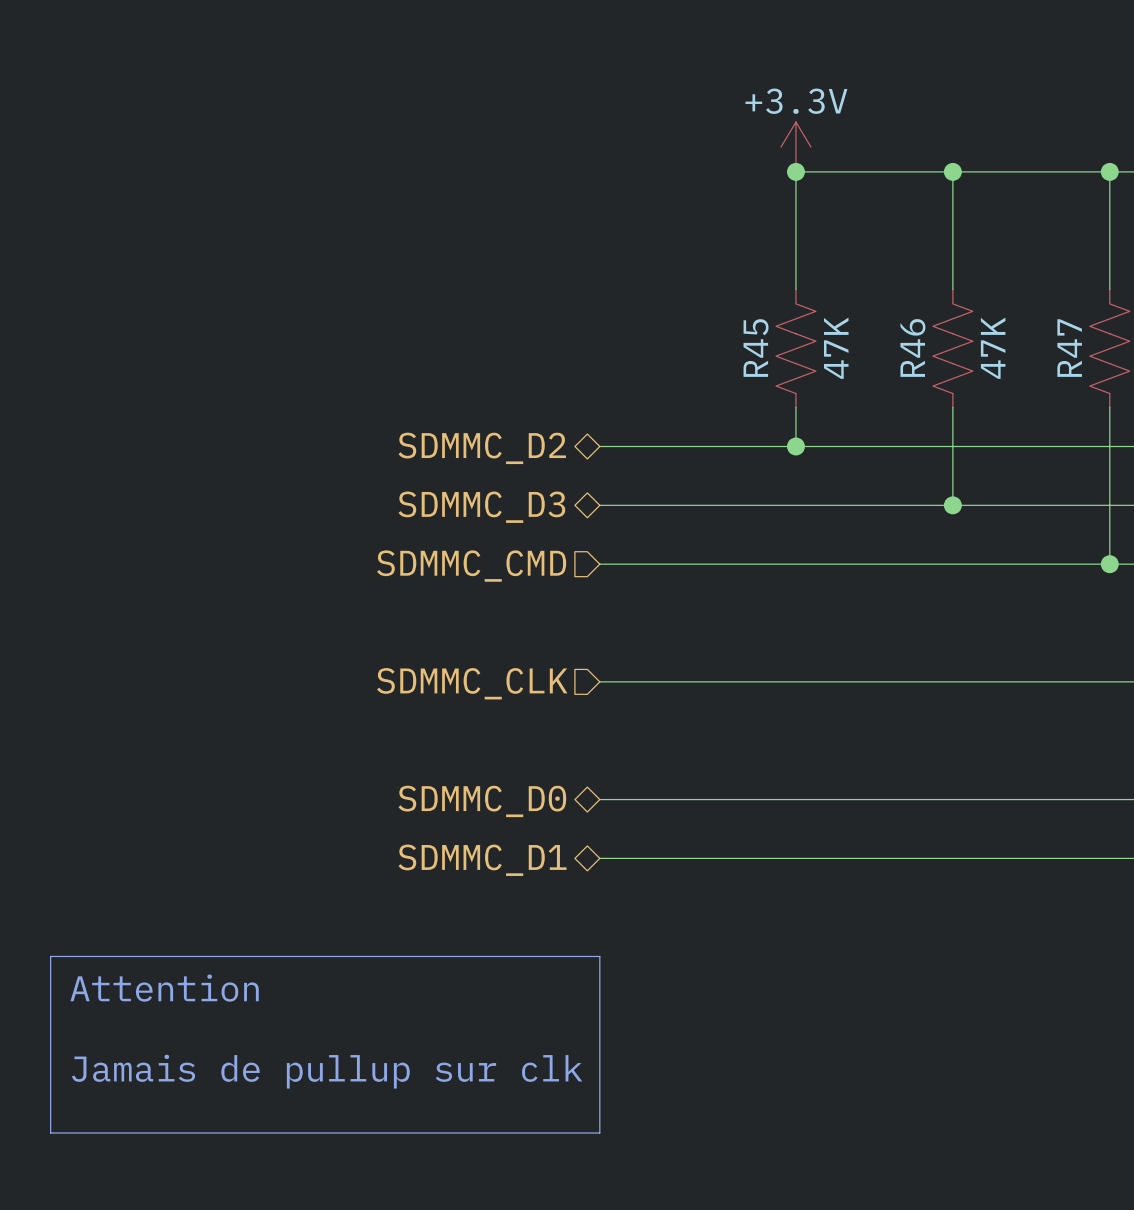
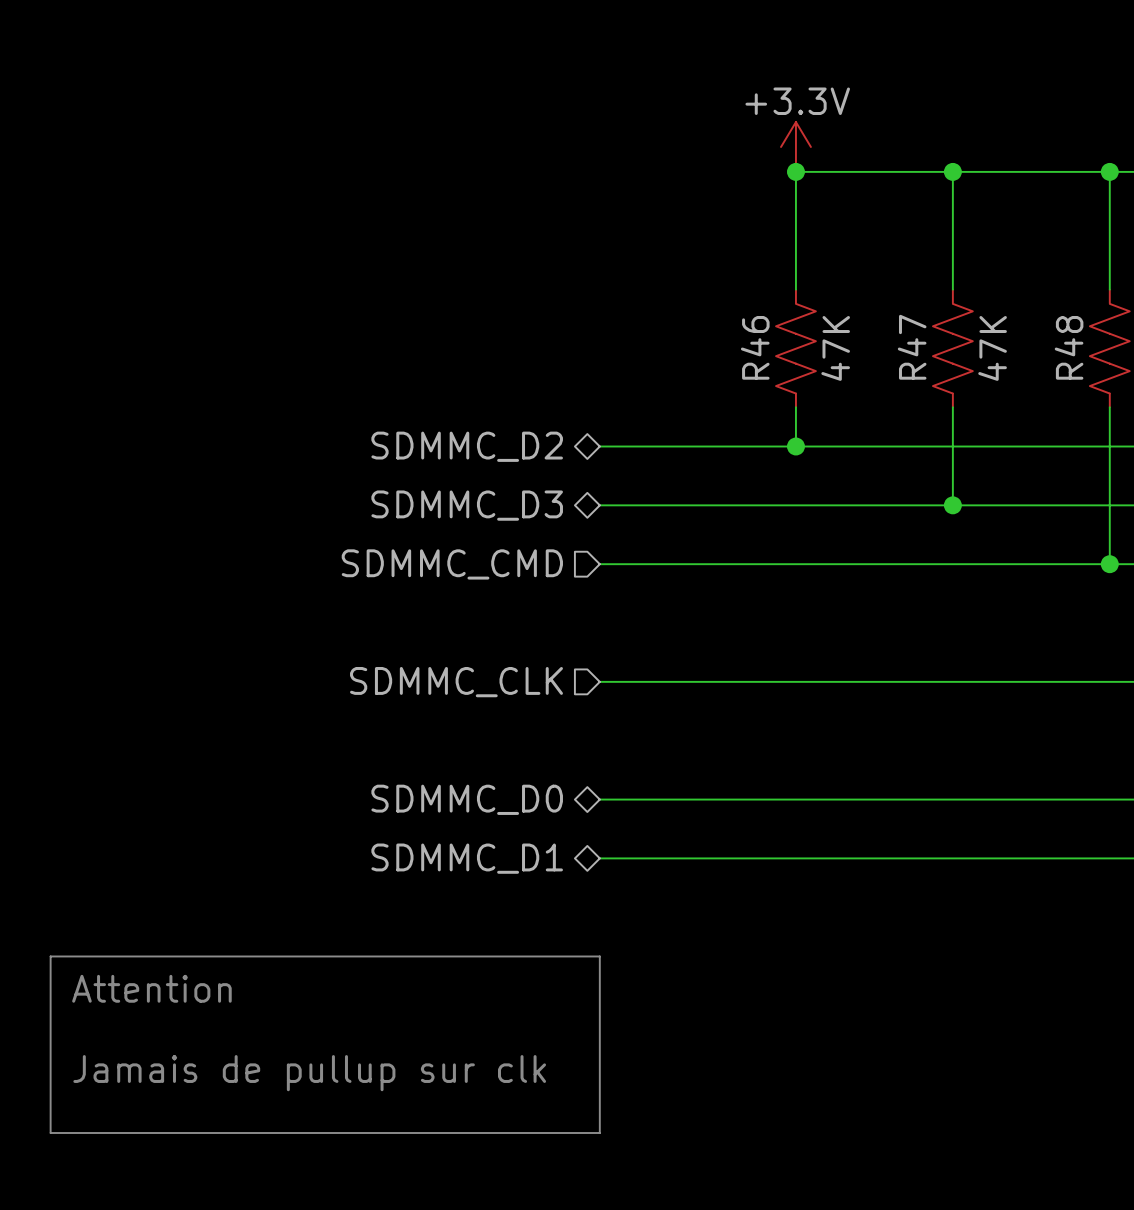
R46 name: R46 (912, 347) -> R47 (912, 347)
R45 name: R45 (756, 348) -> R46 (755, 347)
R47 name: R47 (1069, 348) -> R48 (1069, 347)

